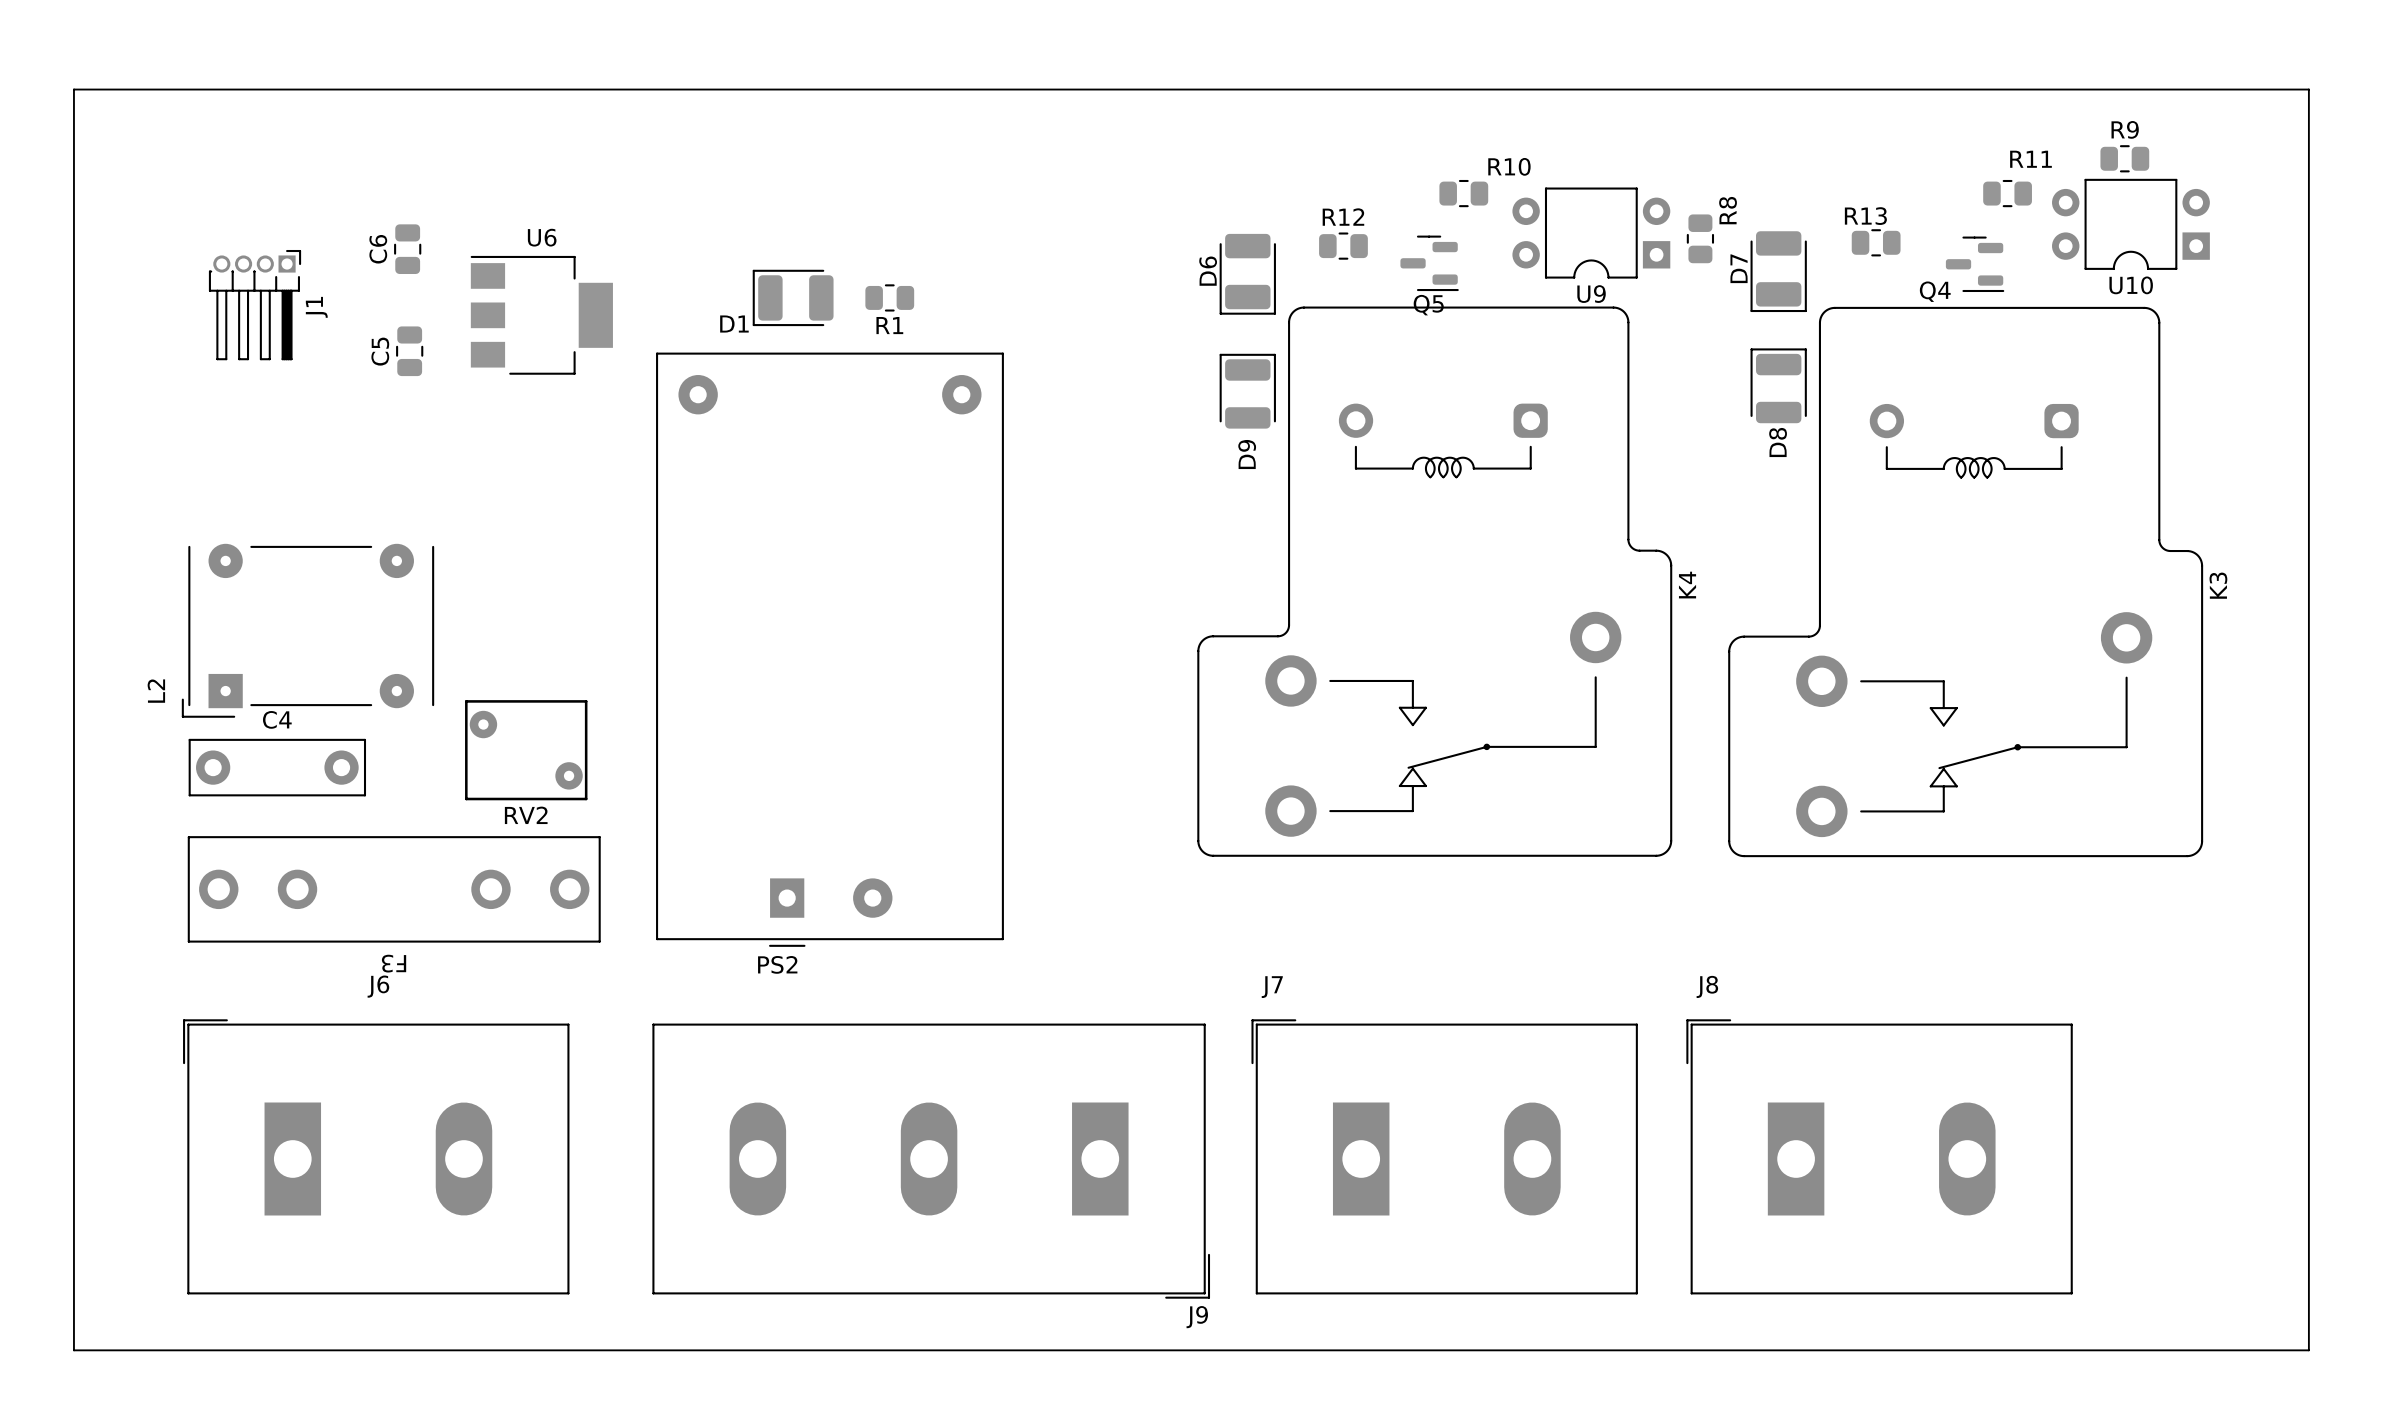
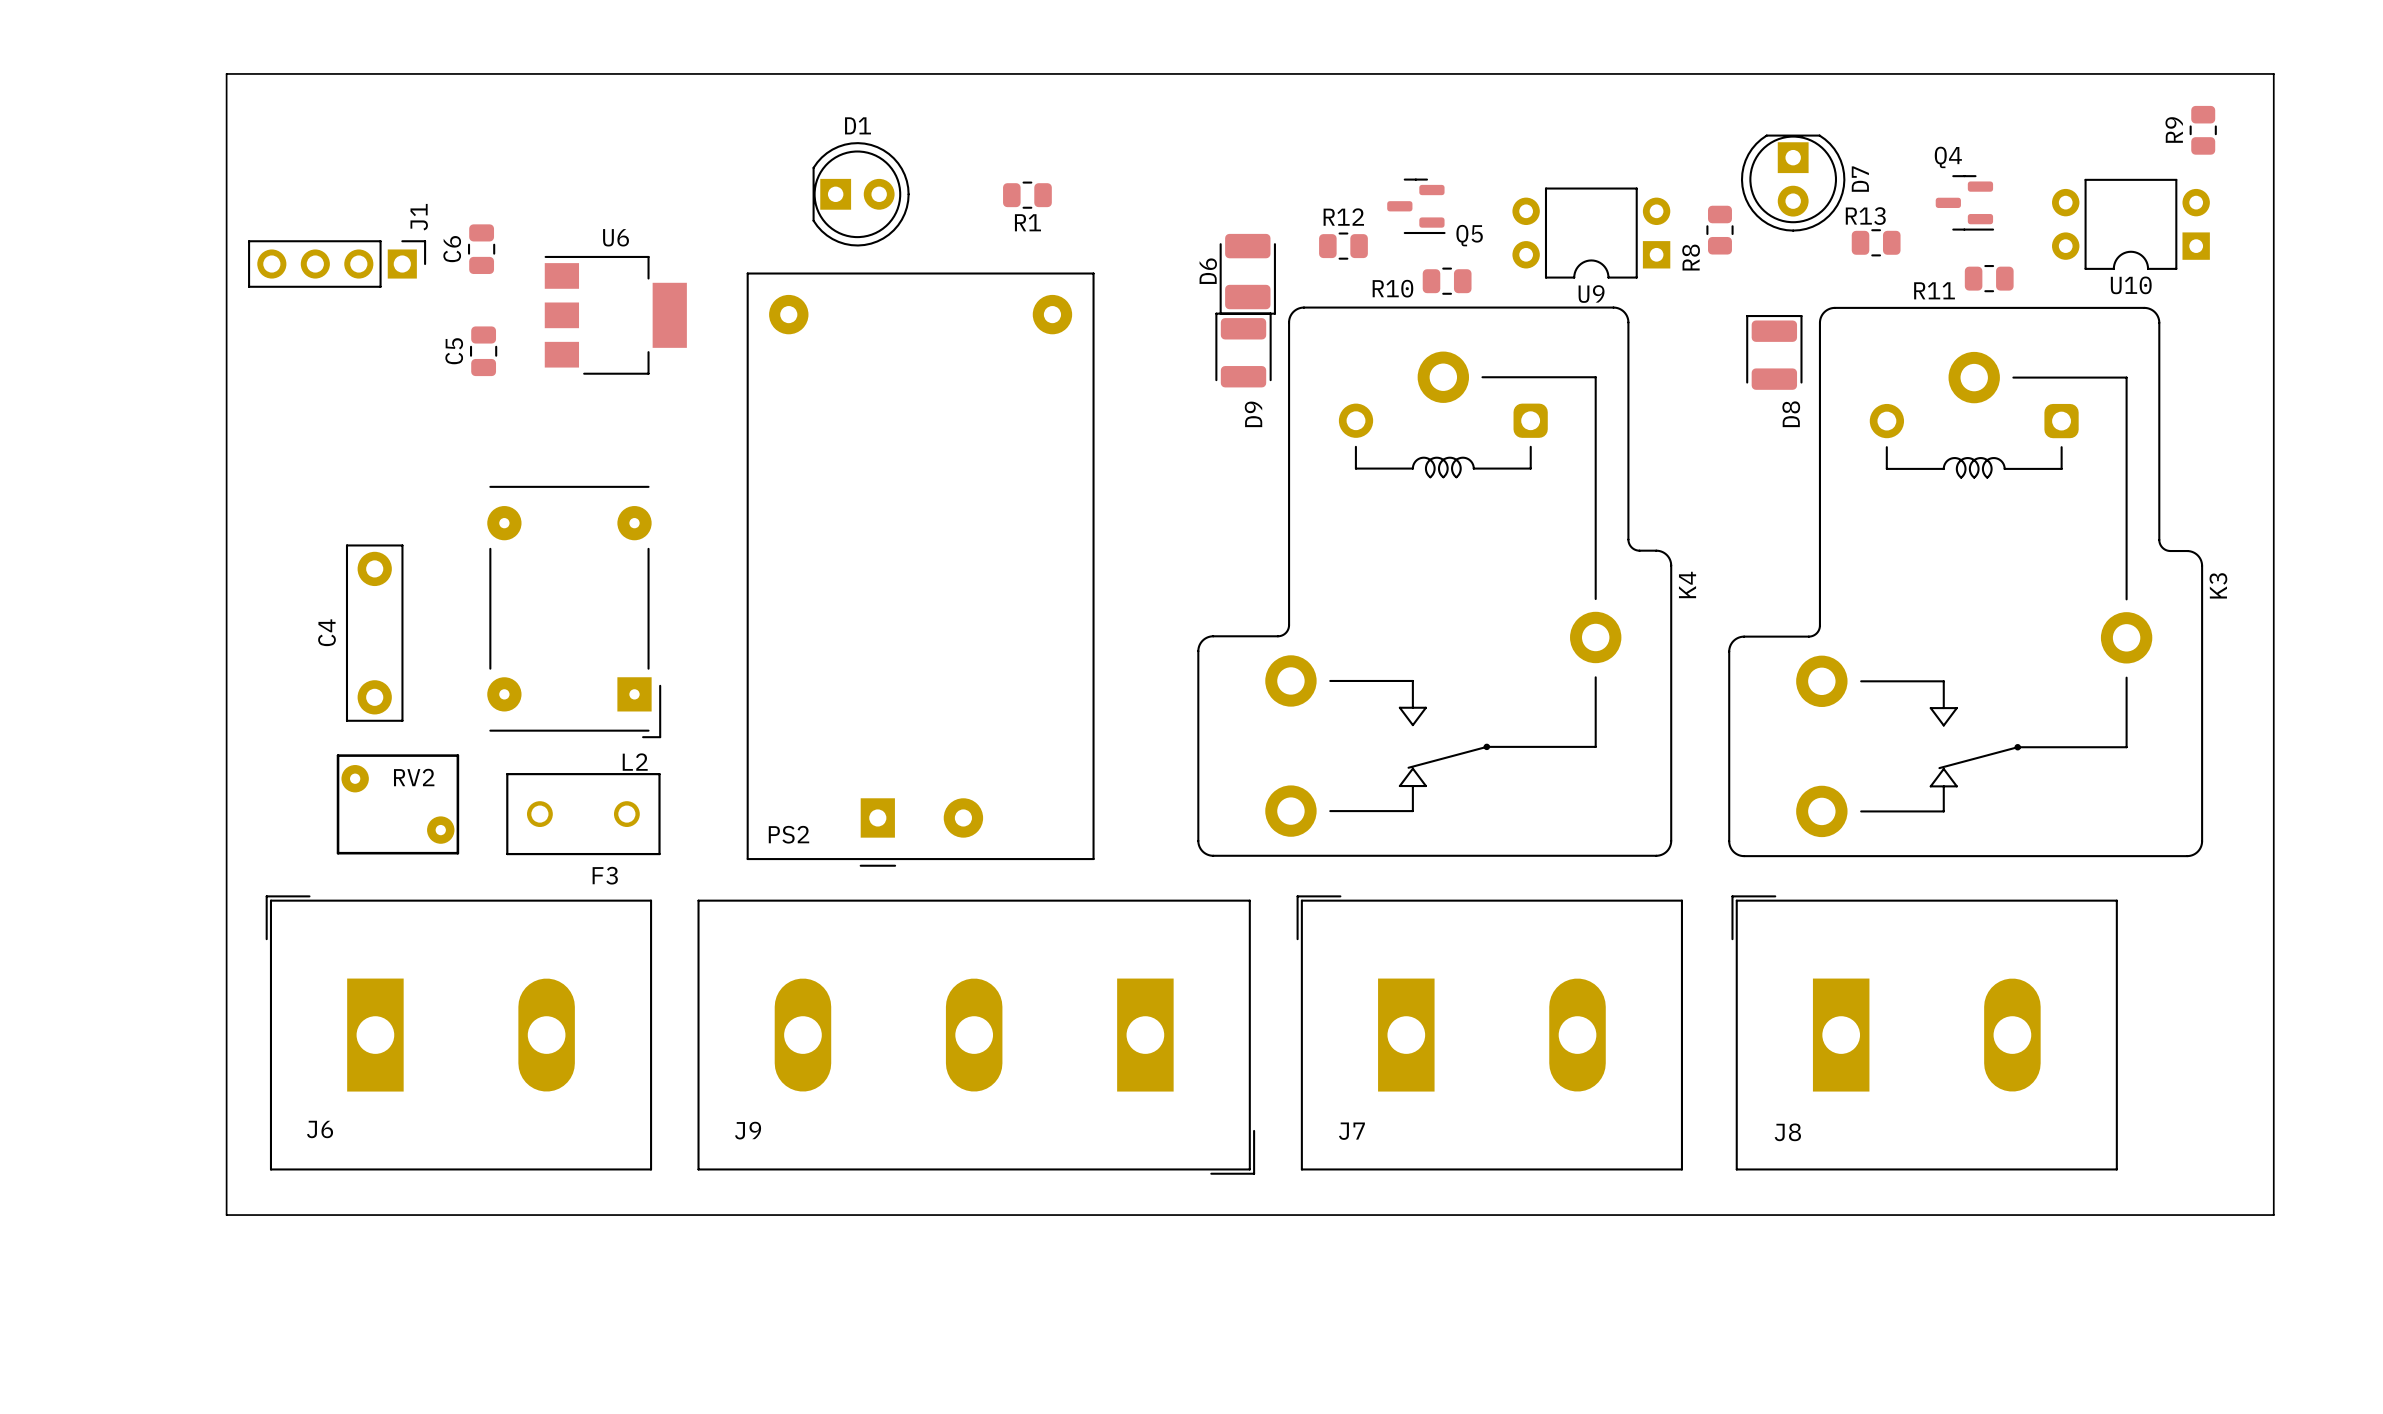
board edge: (73, 89) (2308, 89) (2308, 1350) (73, 1350) (73, 89) -> (226, 73) (226, 1215) (2273, 1215) (2273, 73) (226, 73)
R9 name position: R9 (2125, 129) -> R9 (2174, 129)
R9 rotation: 0° (2124, 158) -> 90° clockwise (2203, 130)
R9 position: (2124, 158) -> (2203, 130)
R11 name position: R11 (2030, 159) -> R11 (1934, 290)
R10 name position: R10 (1509, 166) -> R10 (1392, 288)
R10 position: (1463, 193) -> (1447, 281)
R11 position: (2007, 193) -> (1989, 278)
R8 name position: R8 (1728, 210) -> R8 (1691, 257)
D7 footprint: [1750, 231, 1807, 313] -> [1740, 134, 1846, 232]
R8 position: (1700, 238) -> (1719, 230)
J1 footprint: [208, 249, 302, 361] -> [248, 240, 427, 288]
C6 position: (407, 249) -> (481, 249)
Q5 position: (1429, 263) -> (1416, 206)
Q4 position: (1975, 264) -> (1964, 202)
D7 name position: D7 (1739, 268) -> D7 (1860, 179)
D1 footprint: [752, 269, 834, 327] -> [812, 142, 910, 247]
Q4 name position: Q4 (1935, 291) -> Q4 (1948, 157)
R1 position: (889, 297) -> (1027, 195)
Q5 name position: Q5 (1428, 305) -> Q5 (1469, 235)
K4 footprint: [1197, 306, 1673, 857] -> [1197, 306, 1673, 857]
K3 footprint: [1728, 306, 2204, 858] -> [1728, 306, 2204, 858]
J1 name position: J1 (316, 307) -> J1 (419, 217)
U6 position: (541, 315) -> (615, 315)
D1 name position: D1 (734, 324) -> D1 (858, 125)
C5 position: (409, 351) -> (483, 351)
D8 position: (1778, 385) -> (1774, 352)
D9 position: (1247, 391) -> (1243, 350)
D8 name position: D8 (1778, 442) -> D8 (1791, 414)
D9 name position: D9 (1247, 454) -> D9 (1253, 414)
L2 rotation: 0° (307, 630) -> 90° counterclockwise (574, 612)
L2 position: (307, 630) -> (574, 612)
PS2 position: (829, 649) -> (920, 569)
C4 name position: C4 (277, 719) -> C4 (327, 632)
RV2 position: (526, 750) -> (397, 804)
C4 rotation: 0° (277, 767) -> 90° clockwise (374, 633)
C4 position: (277, 767) -> (374, 633)
RV2 name position: RV2 (526, 815) -> RV2 (414, 777)
F3 footprint: [187, 836, 601, 943] -> [506, 773, 661, 856]
PS2 name position: PS2 (777, 964) -> PS2 (788, 834)
J6 name position: J6 (378, 986) -> J6 (320, 1129)
J8 name position: J8 (1707, 986) -> J8 (1787, 1132)
J7 name position: J7 (1272, 987) -> J7 (1351, 1131)
J6 position: (376, 1156) -> (458, 1032)
J7 position: (1444, 1156) -> (1489, 1032)
J8 position: (1879, 1156) -> (1924, 1032)
J9 position: (931, 1161) -> (976, 1037)
J9 name position: J9 (1197, 1317) -> J9 (748, 1130)

